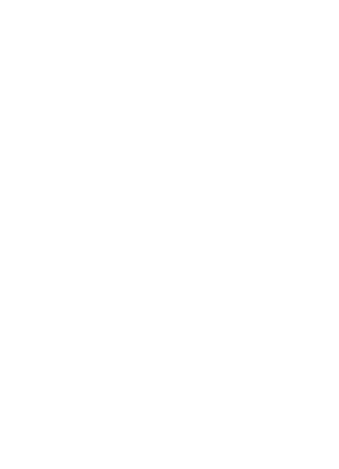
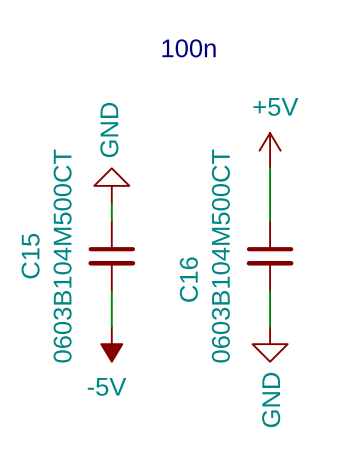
text: none -> 100n (189, 48)
power symbol: none -> +5V (270, 150)
wire: none -> (270, 168) (270, 221)
power symbol: none -> GND (111, 185)
wire: none -> (111, 203) (111, 221)
C15: none -> 0603B104M500CT (111, 256)
C16: none -> 0603B104M500CT (270, 256)
wire: none -> (111, 291) (111, 326)
wire: none -> (270, 291) (270, 326)
power symbol: none -> -5V (111, 344)
power symbol: none -> GND (270, 344)

